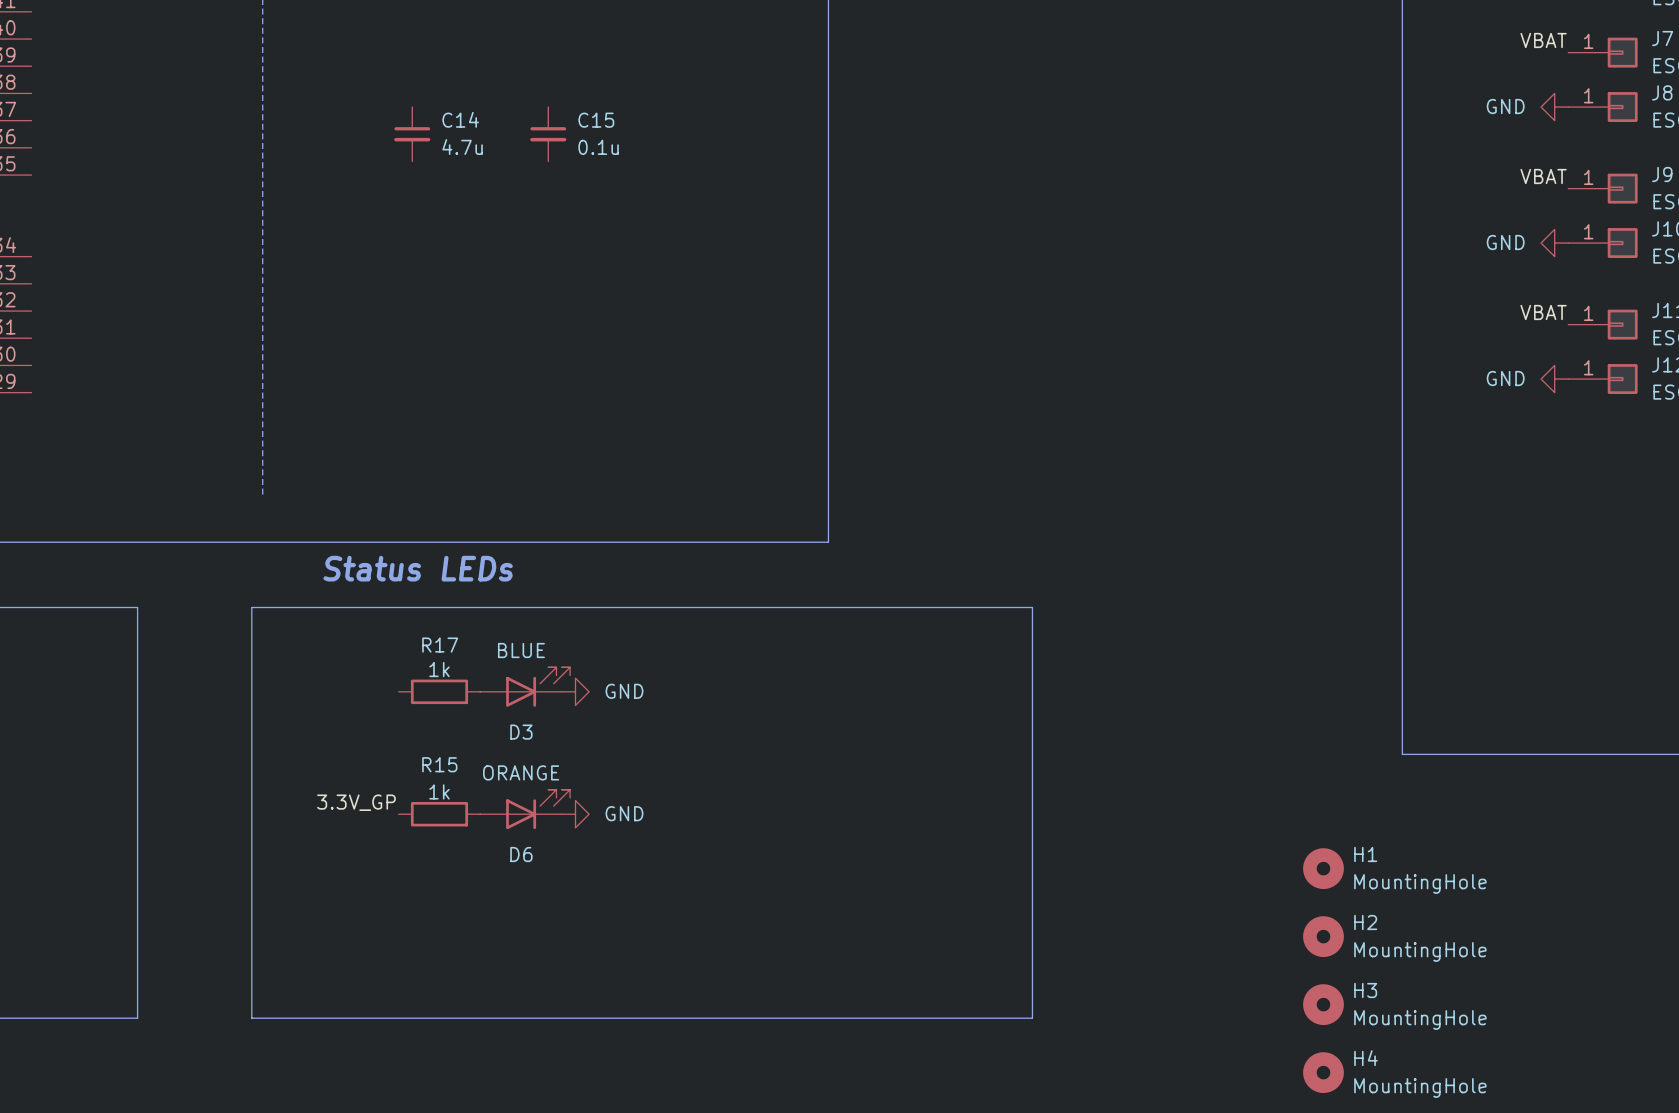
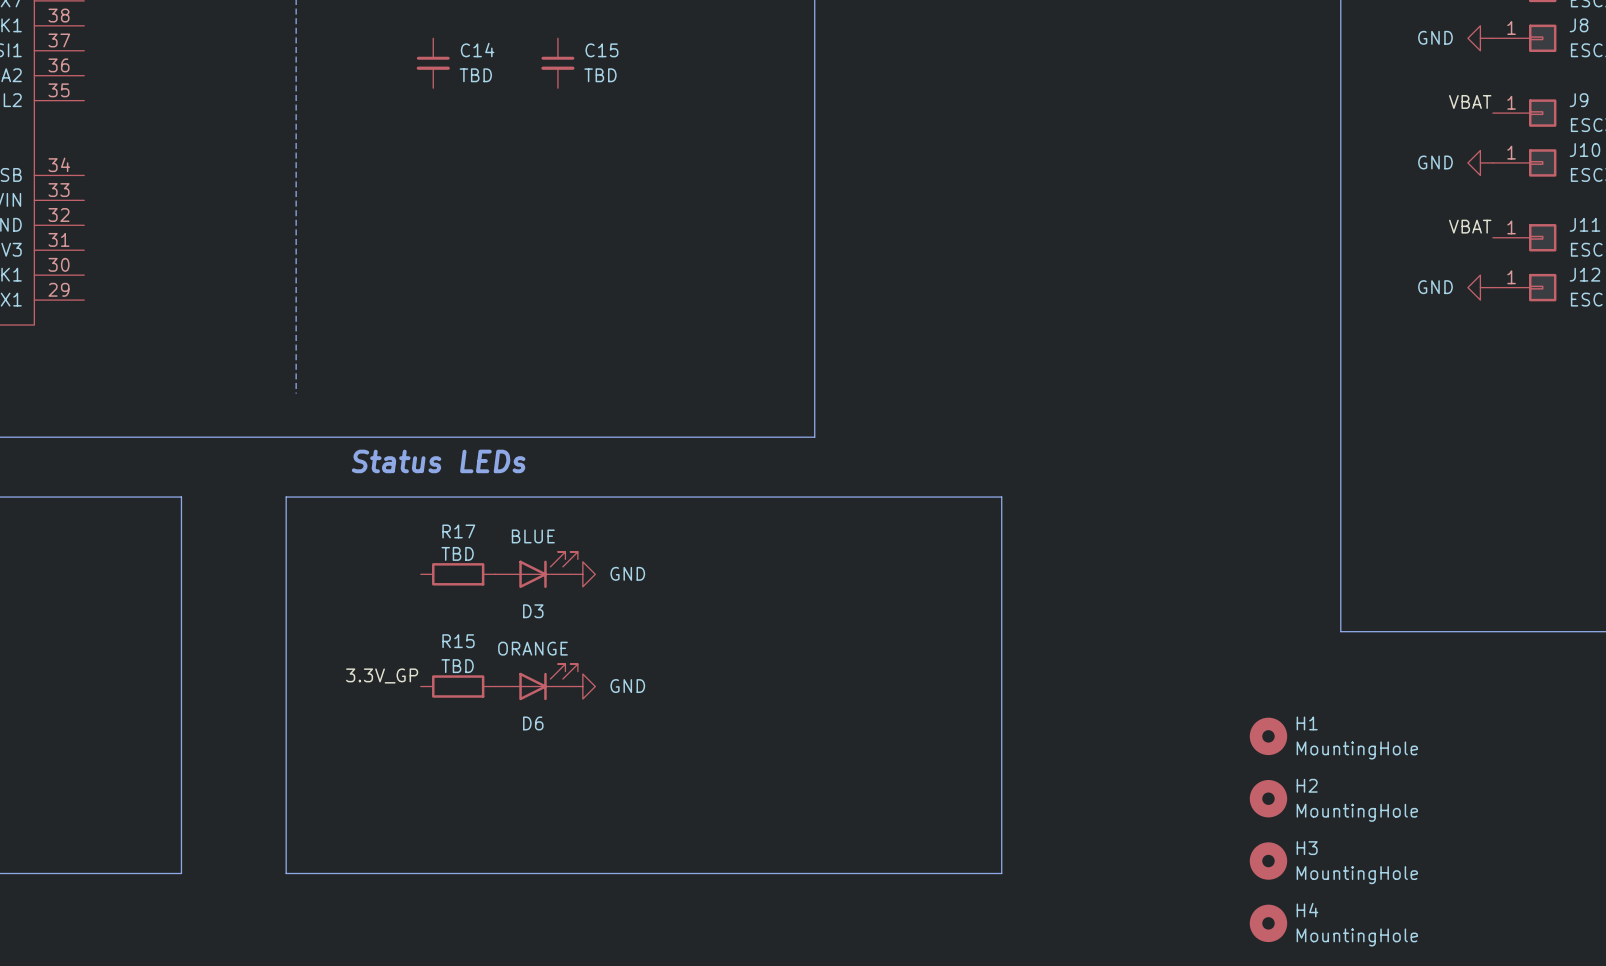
C14 value: 4.7u (462, 147) -> TBD (475, 75)
C15 value: 0.1u (598, 147) -> TBD (600, 75)
R17 value: 1k (439, 669) -> TBD (457, 553)
R15 value: 1k (439, 791) -> TBD (457, 666)

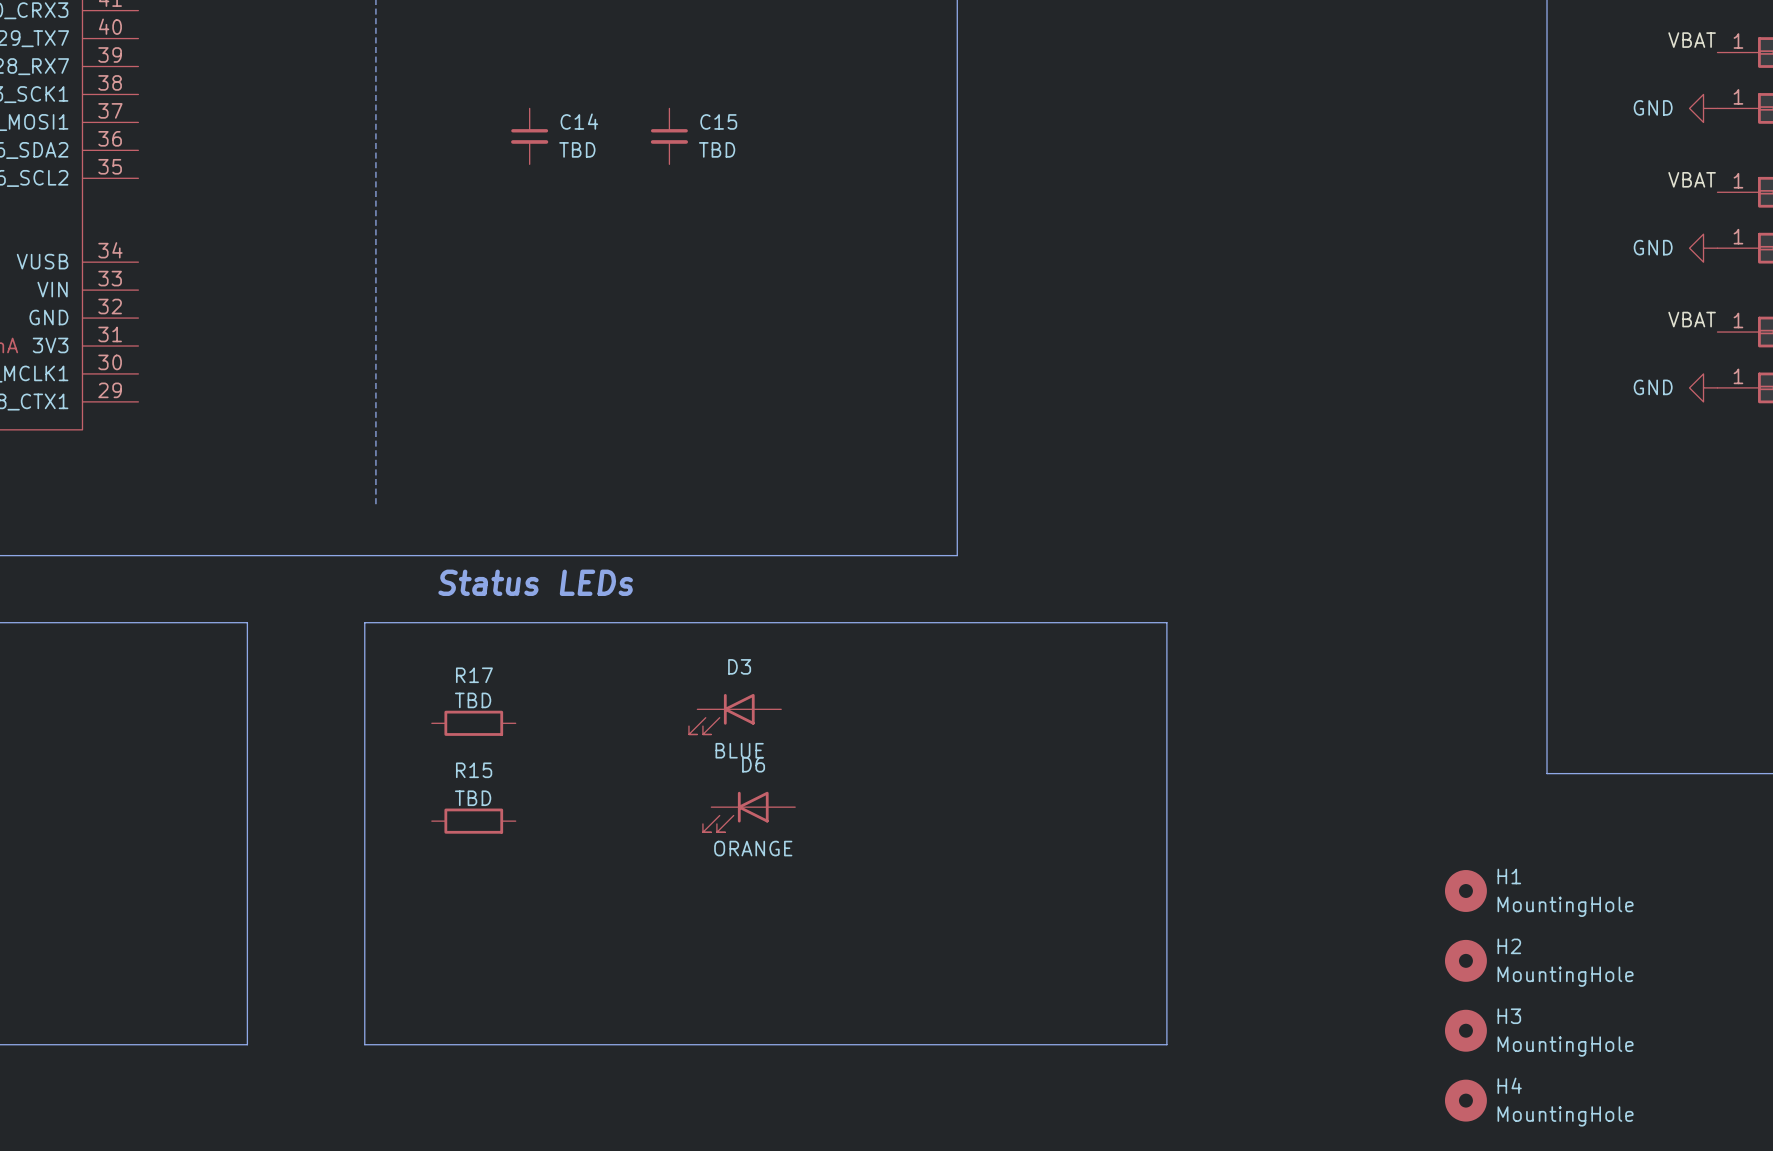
D3 position: (536, 569) -> (735, 714)
D3 rotation: 0° (548, 569) -> 180° (721, 714)
R17 position: (458, 574) -> (473, 723)
power symbol: GND (582, 574) -> none
label: 3.3V_GP (382, 675) -> none
D6 position: (536, 682) -> (749, 812)
D6 rotation: 0° (548, 682) -> 180° (735, 812)
R15 position: (458, 686) -> (473, 821)
power symbol: GND (582, 686) -> none

